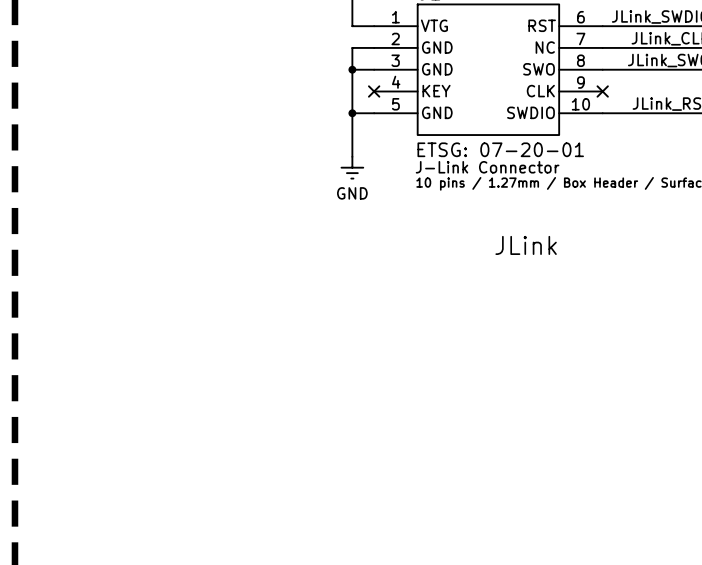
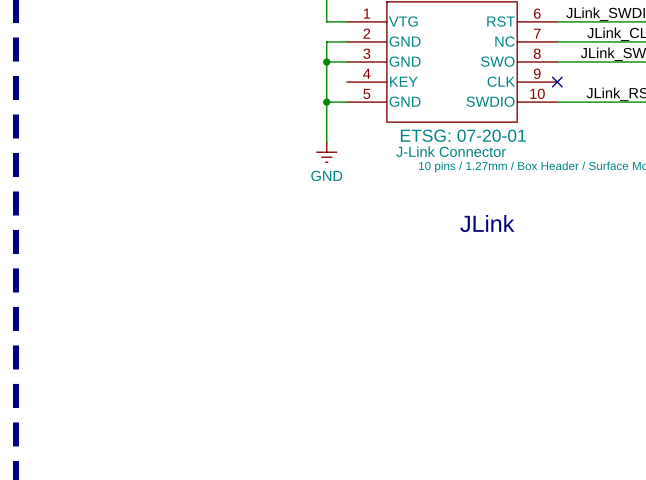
no-connect mark: (374, 91) -> none

